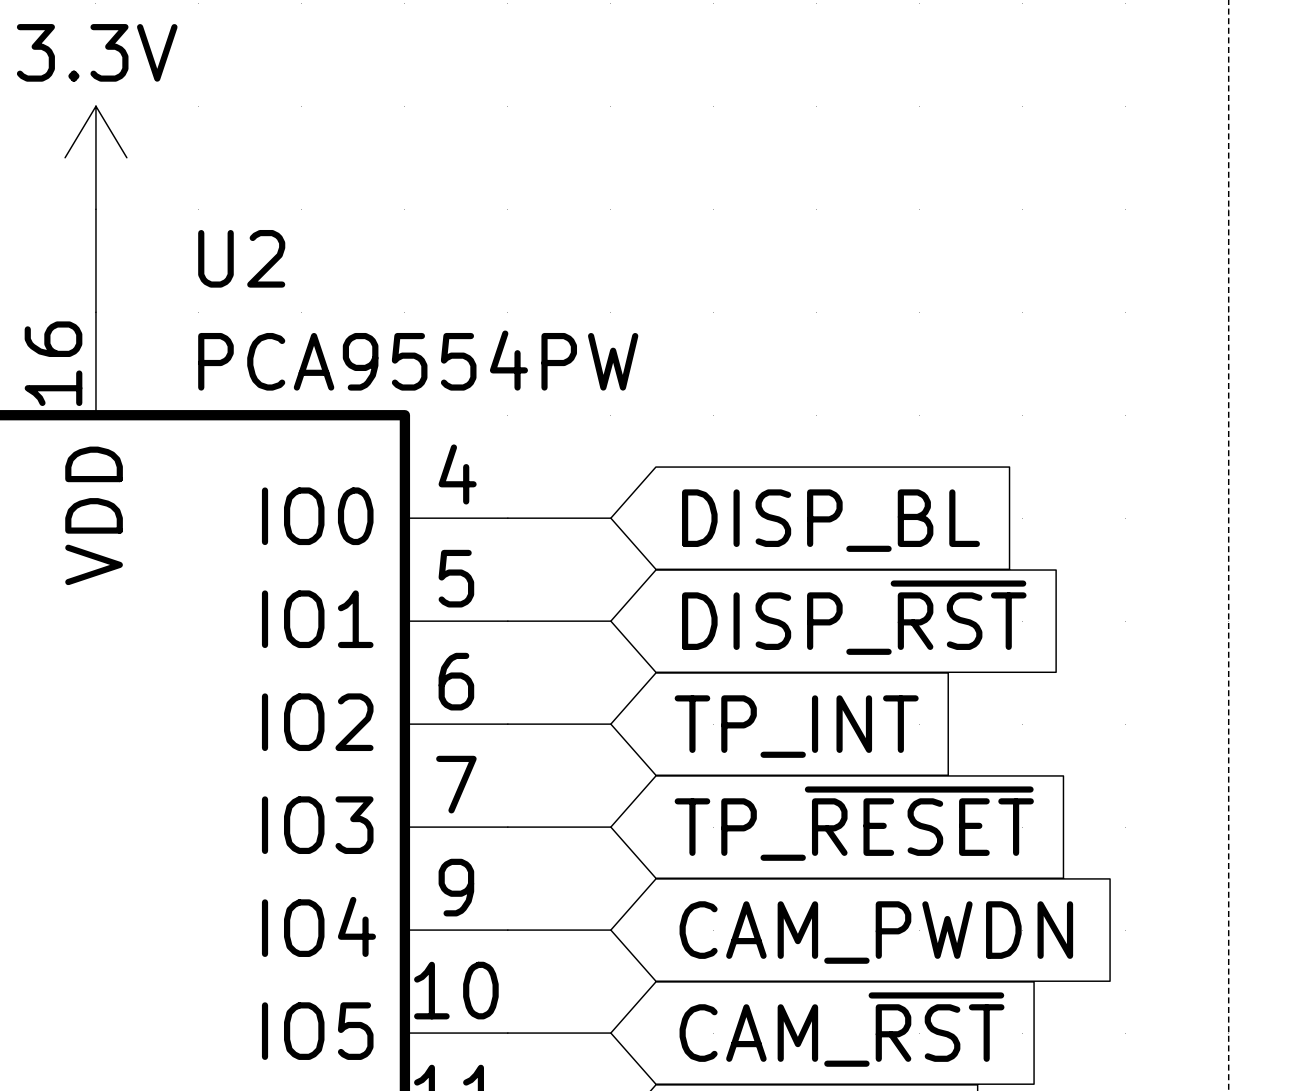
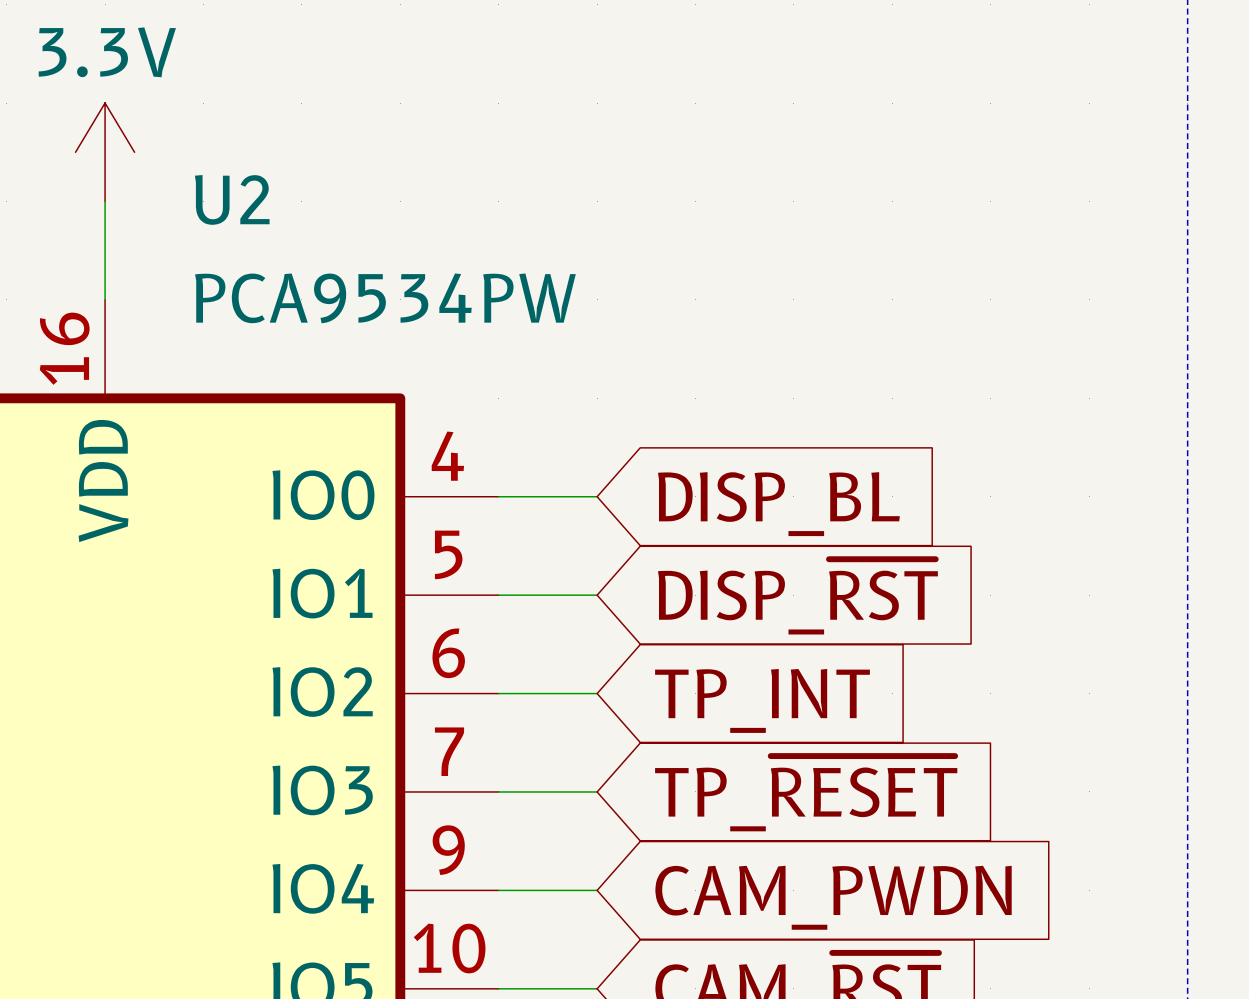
U2 name position: U2 (241, 258) -> U2 (232, 199)
U2 value: PCA9554PW (418, 360) -> PCA9534PW (385, 298)

